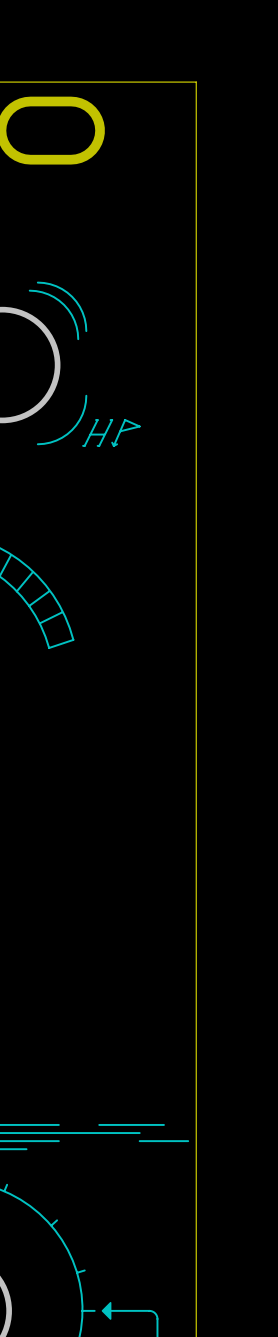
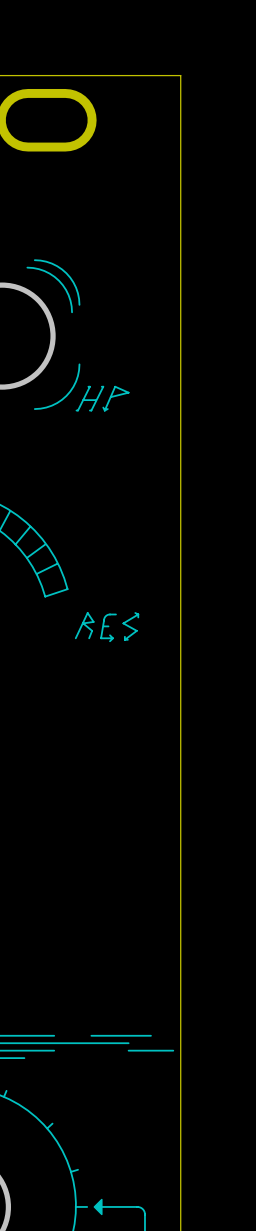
line: none -> (135, 612) (138, 614)
line: none -> (115, 614) (108, 614) (104, 619) (101, 638) (111, 638)
line: none -> (138, 614) (123, 623) (136, 630) (124, 639)
line: none -> (138, 614) (138, 617)
line: none -> (104, 626) (108, 626)
line: none -> (110, 635) (112, 638) (110, 641)
line: none -> (124, 636) (124, 639)
line: none -> (75, 638) (87, 612) (93, 621) (83, 623) (92, 630) (89, 638)
line: none -> (124, 639) (127, 639)

